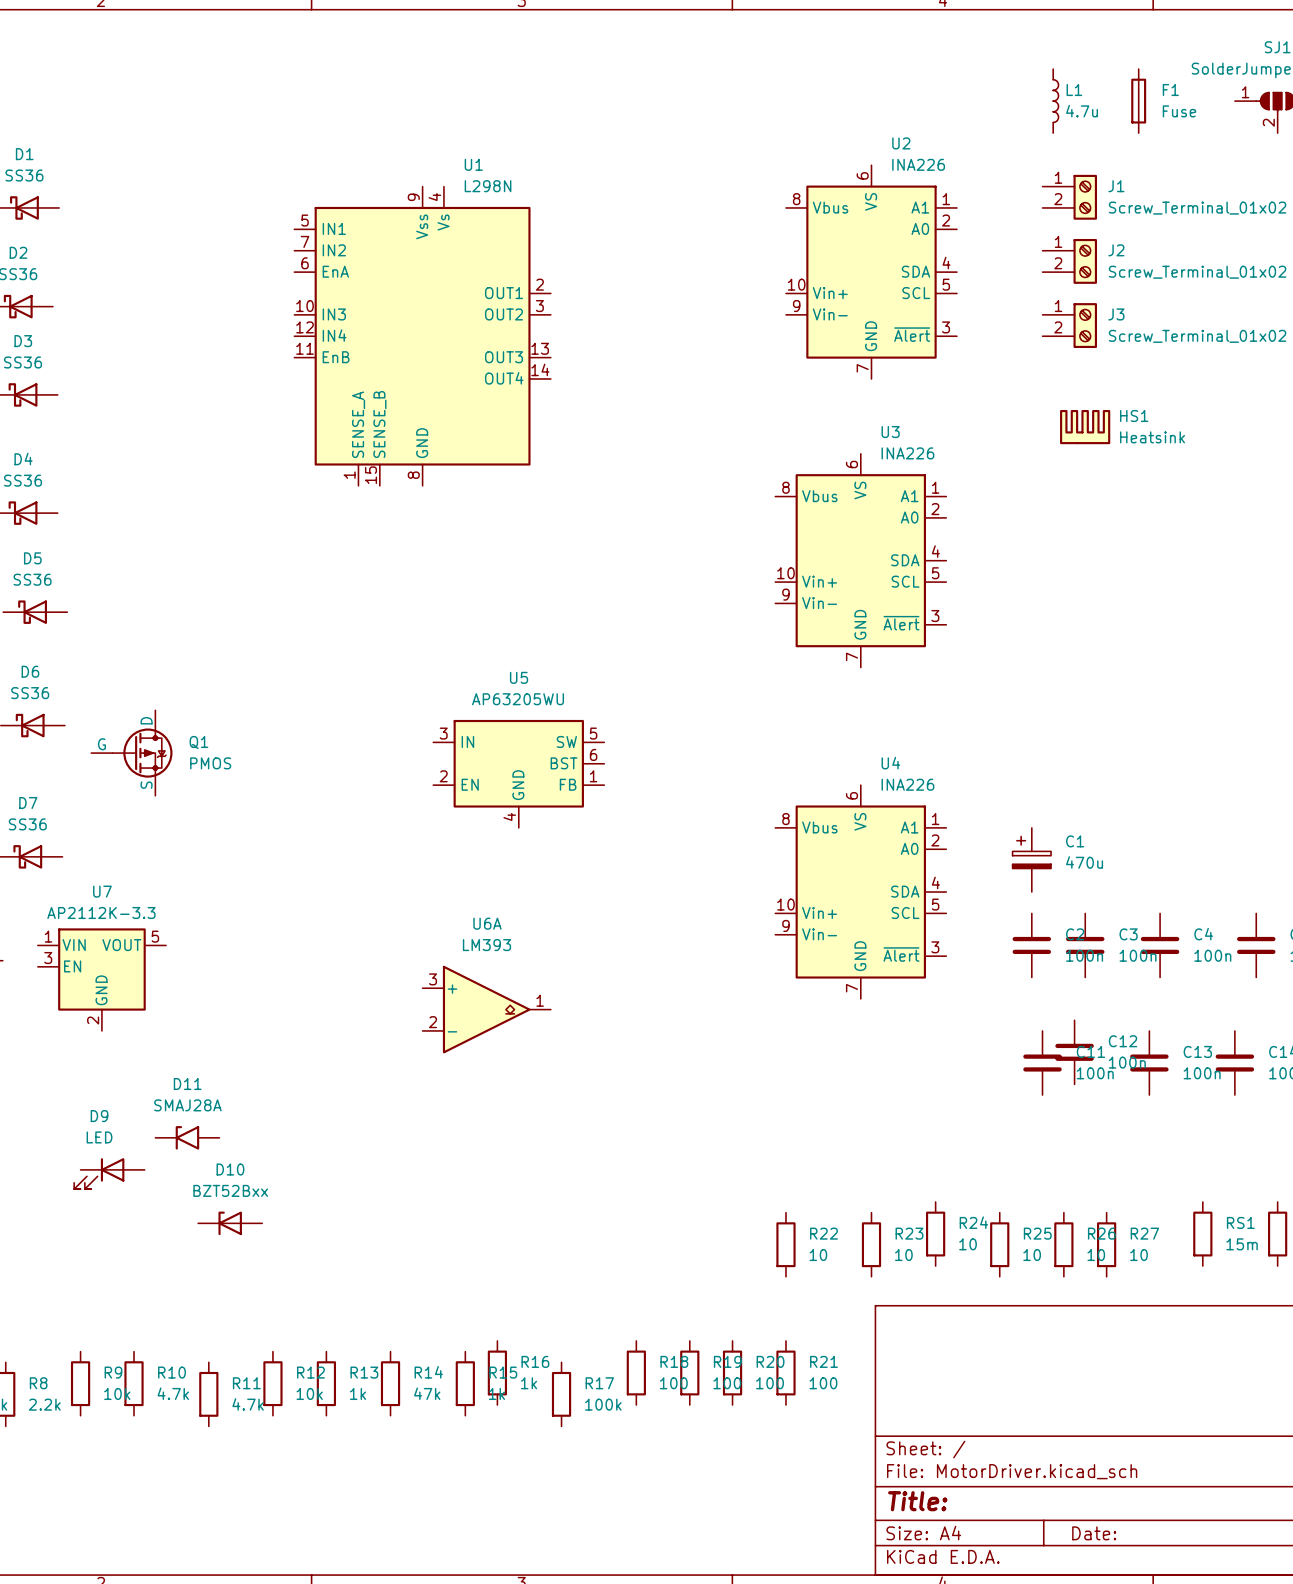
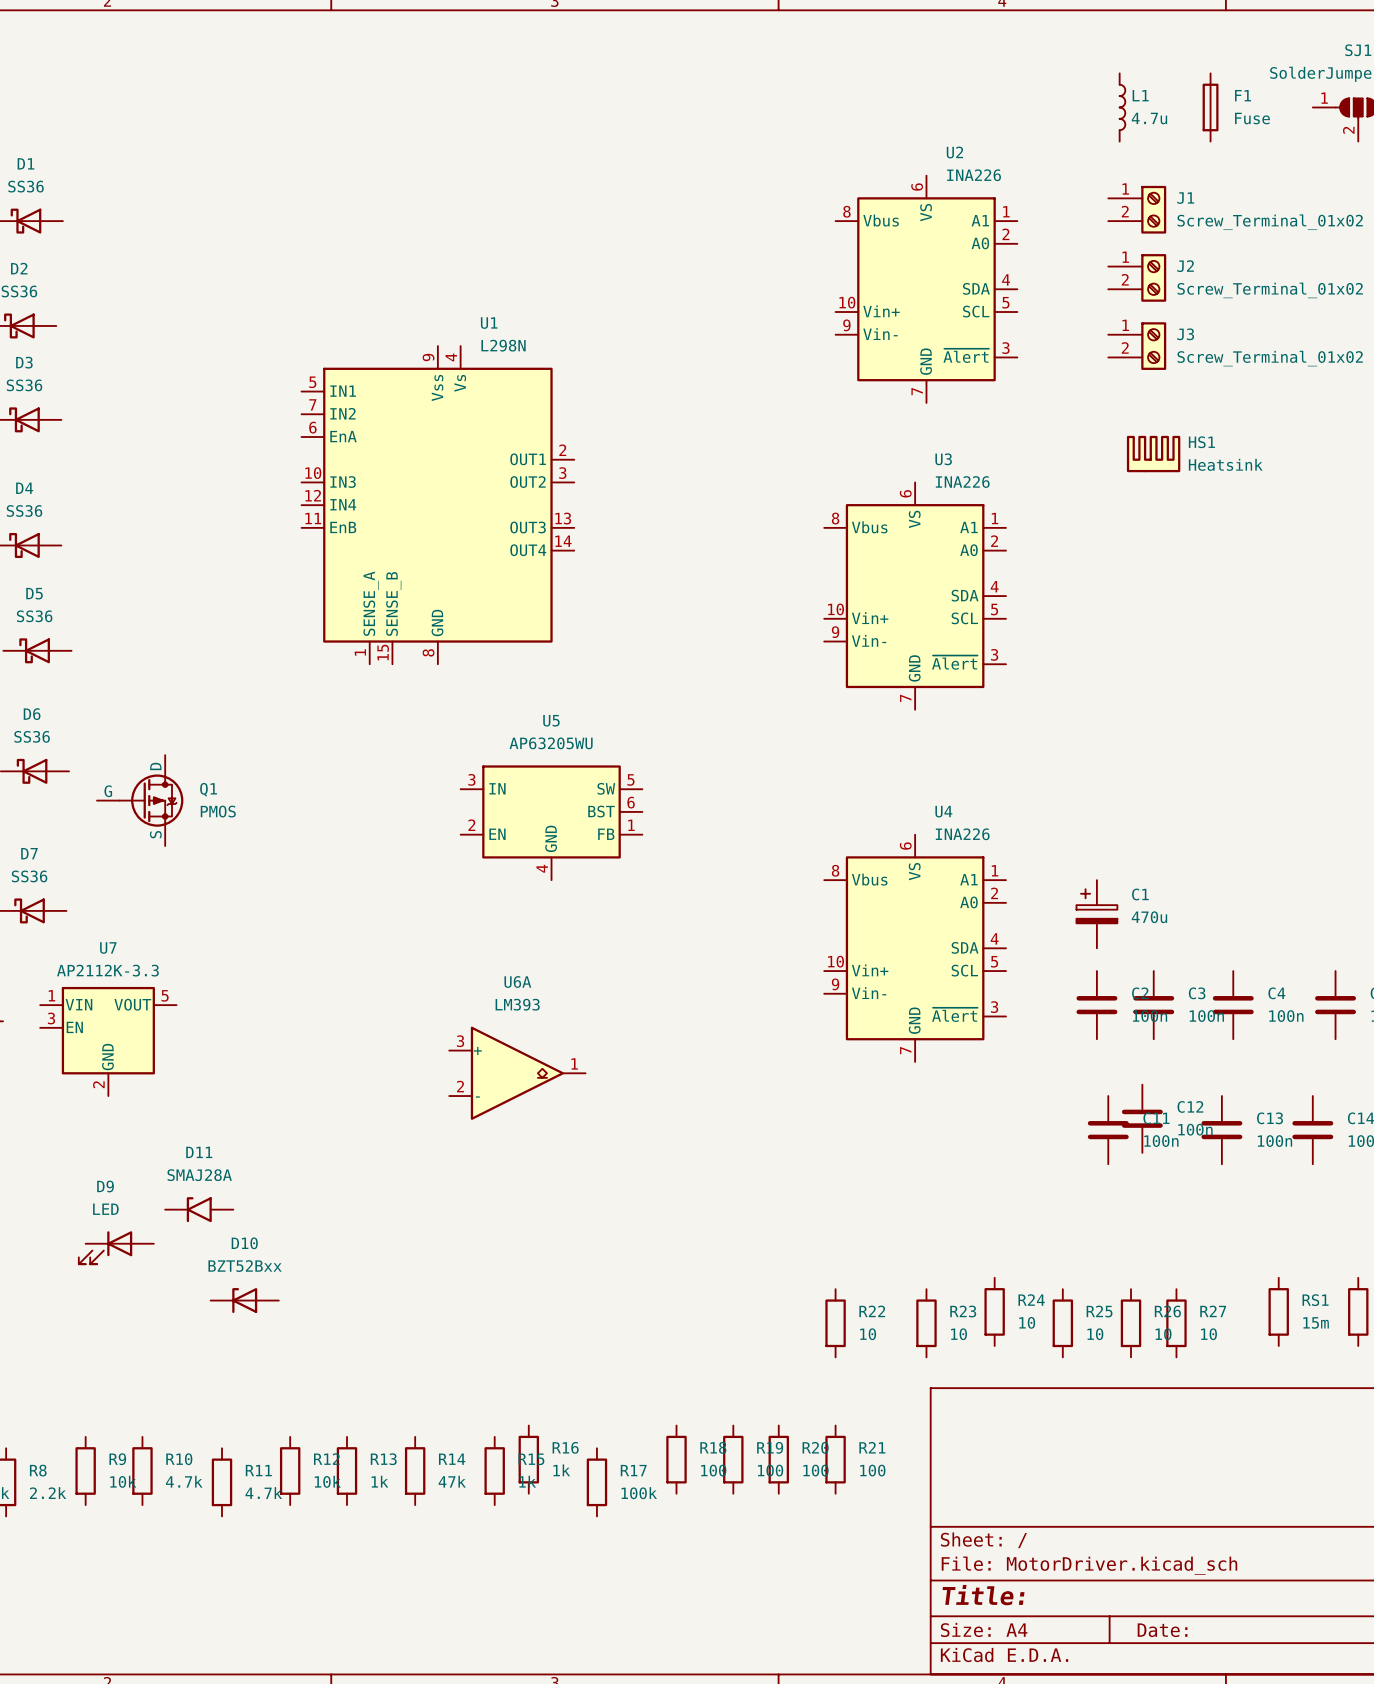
U1 position: (422, 336) -> (437, 505)

